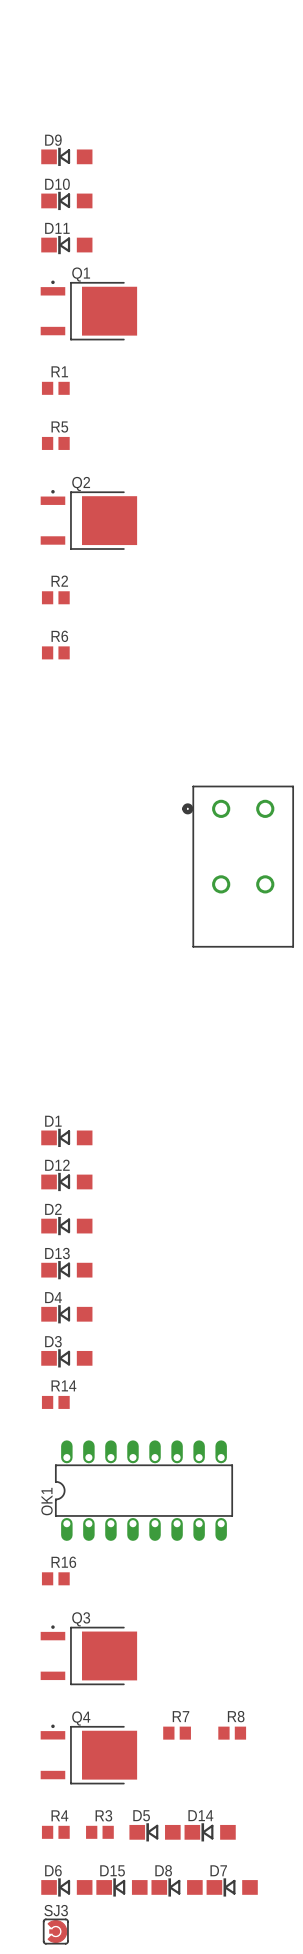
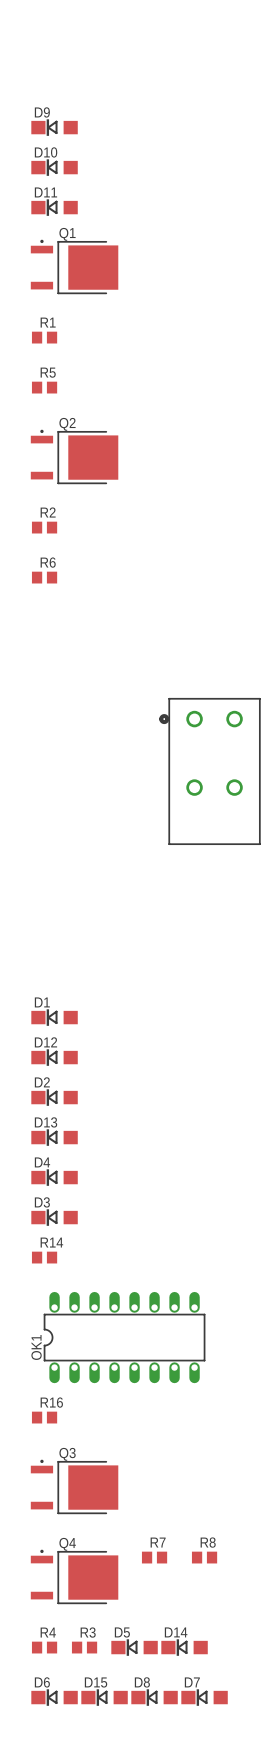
SJ3: (55, 1931) -> none

